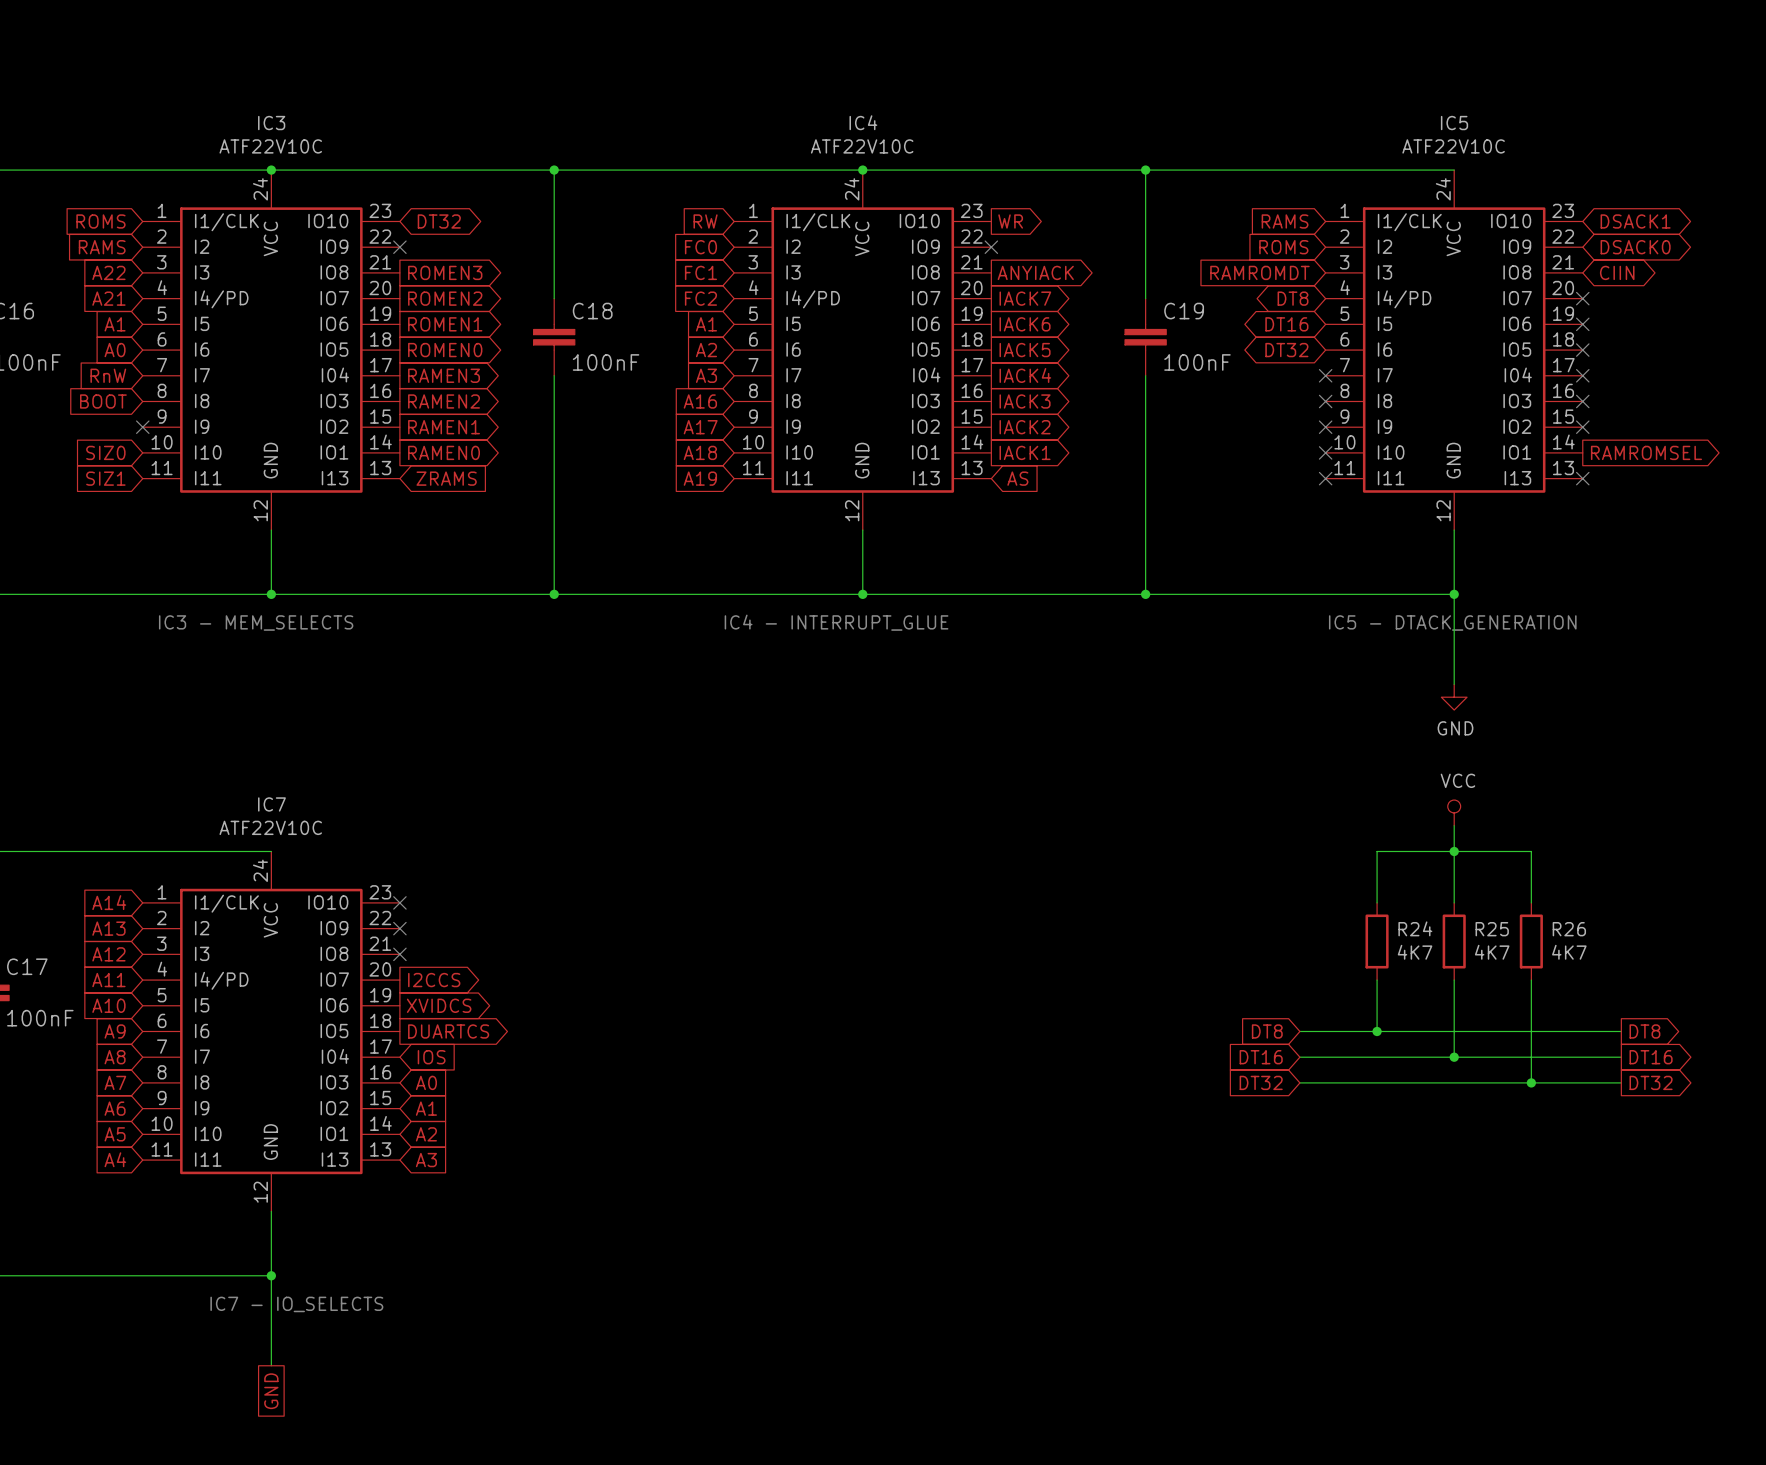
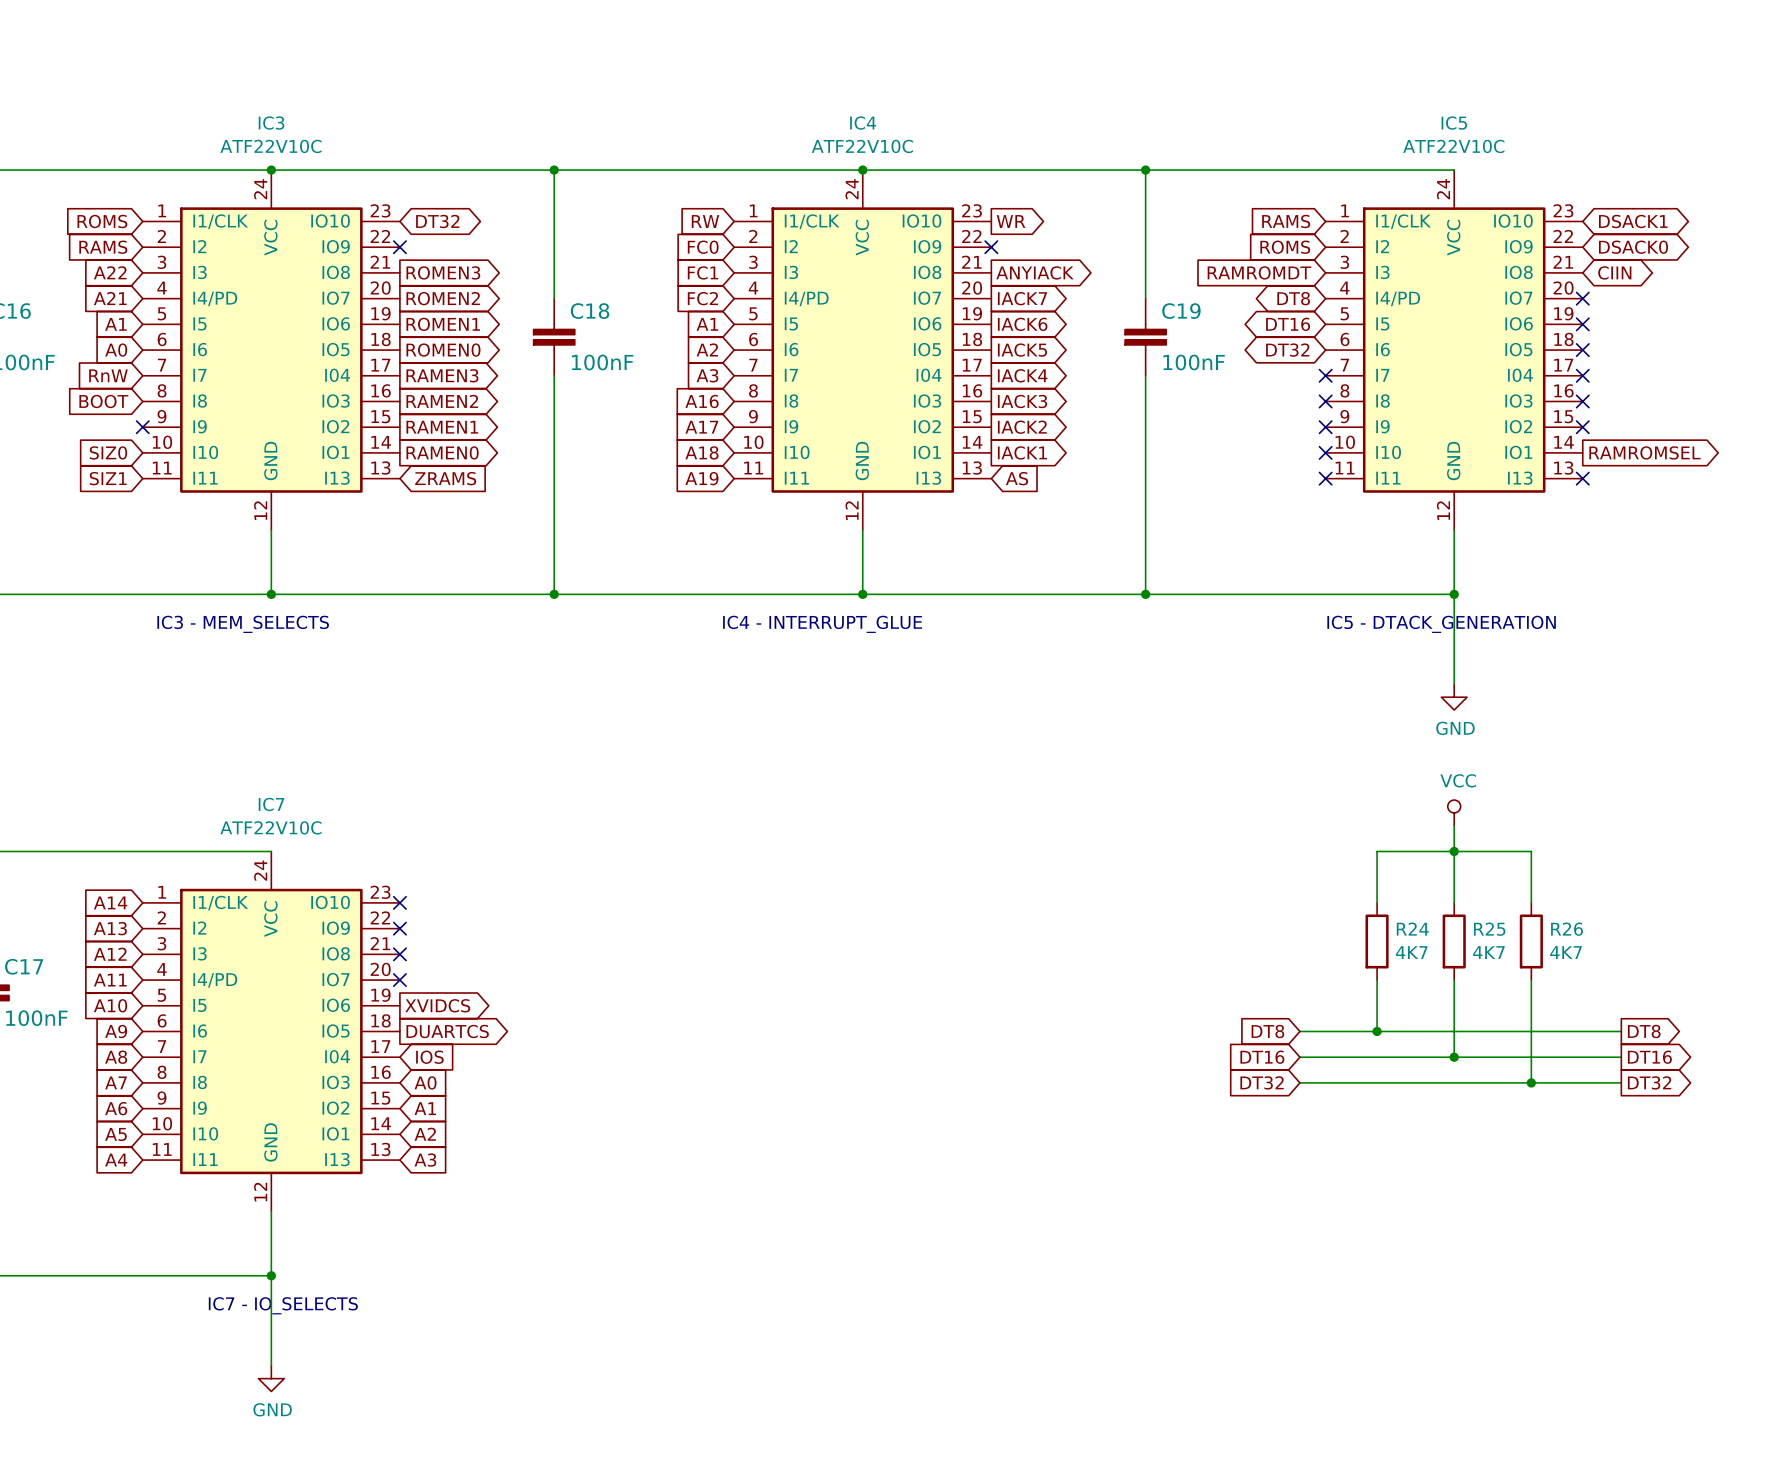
no-connect mark: none -> (399, 980)
global label: I2CCS (434, 980) -> none
power symbol: none -> GND (271, 1378)
global label: GND (271, 1391) -> none

